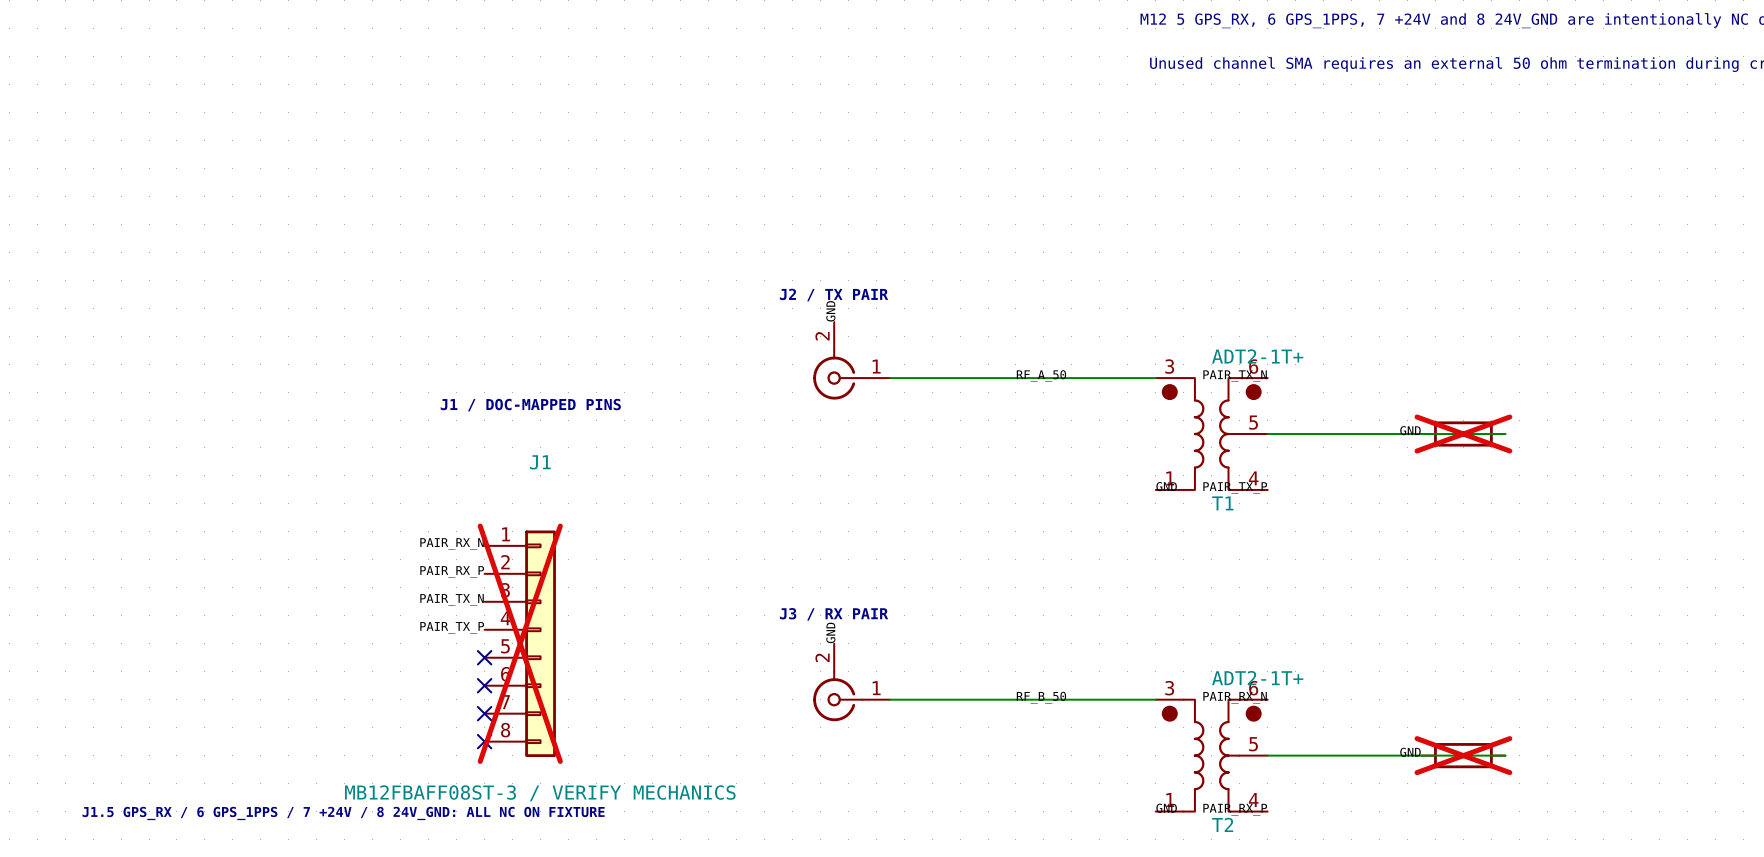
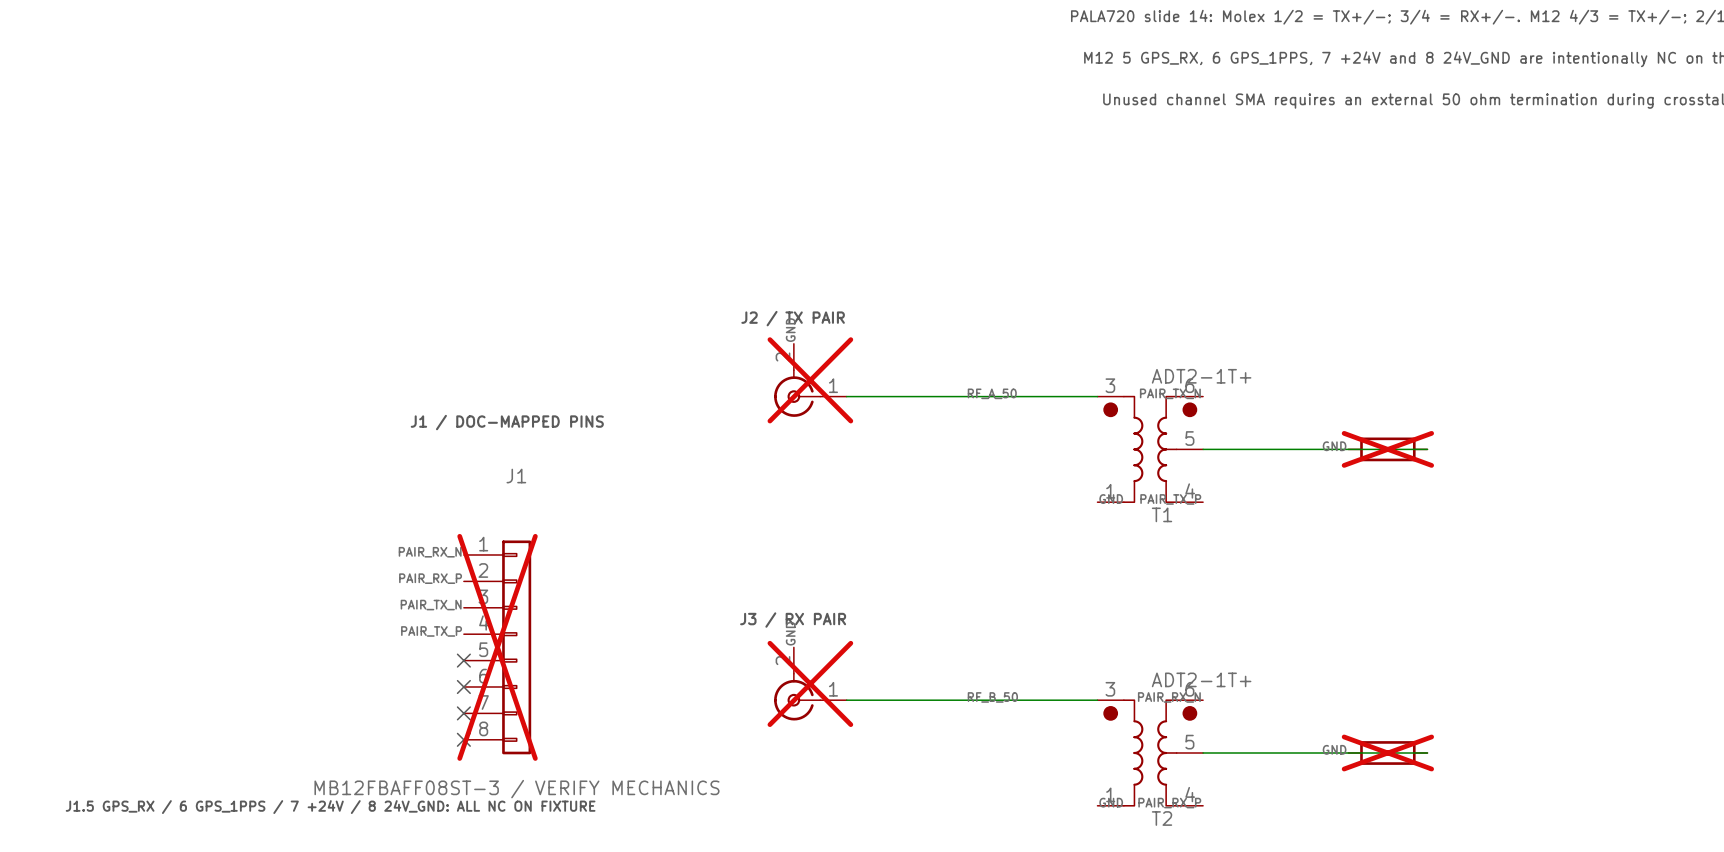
part do-not-place cross: none -> (810, 380)
part do-not-place cross: none -> (810, 683)

